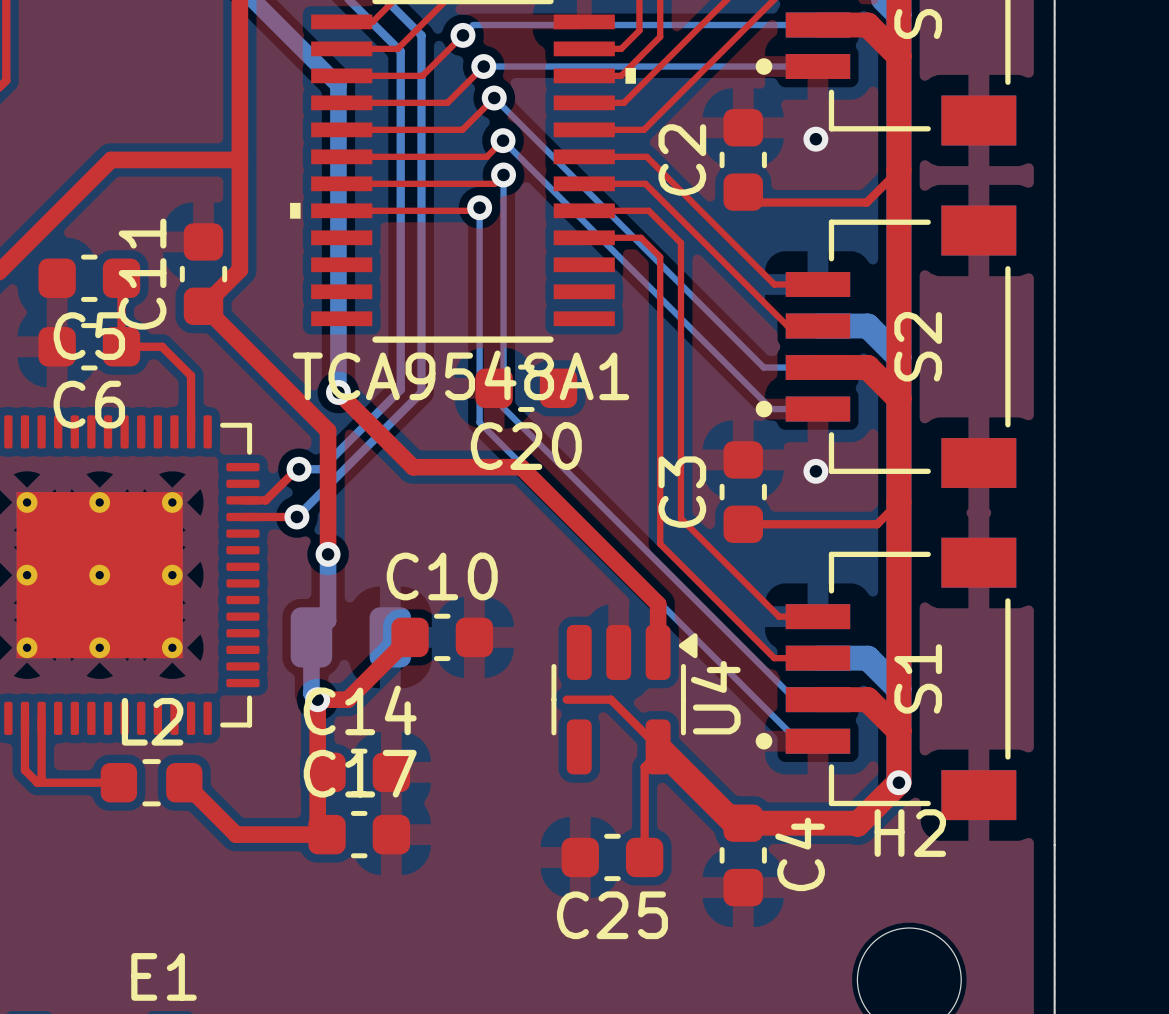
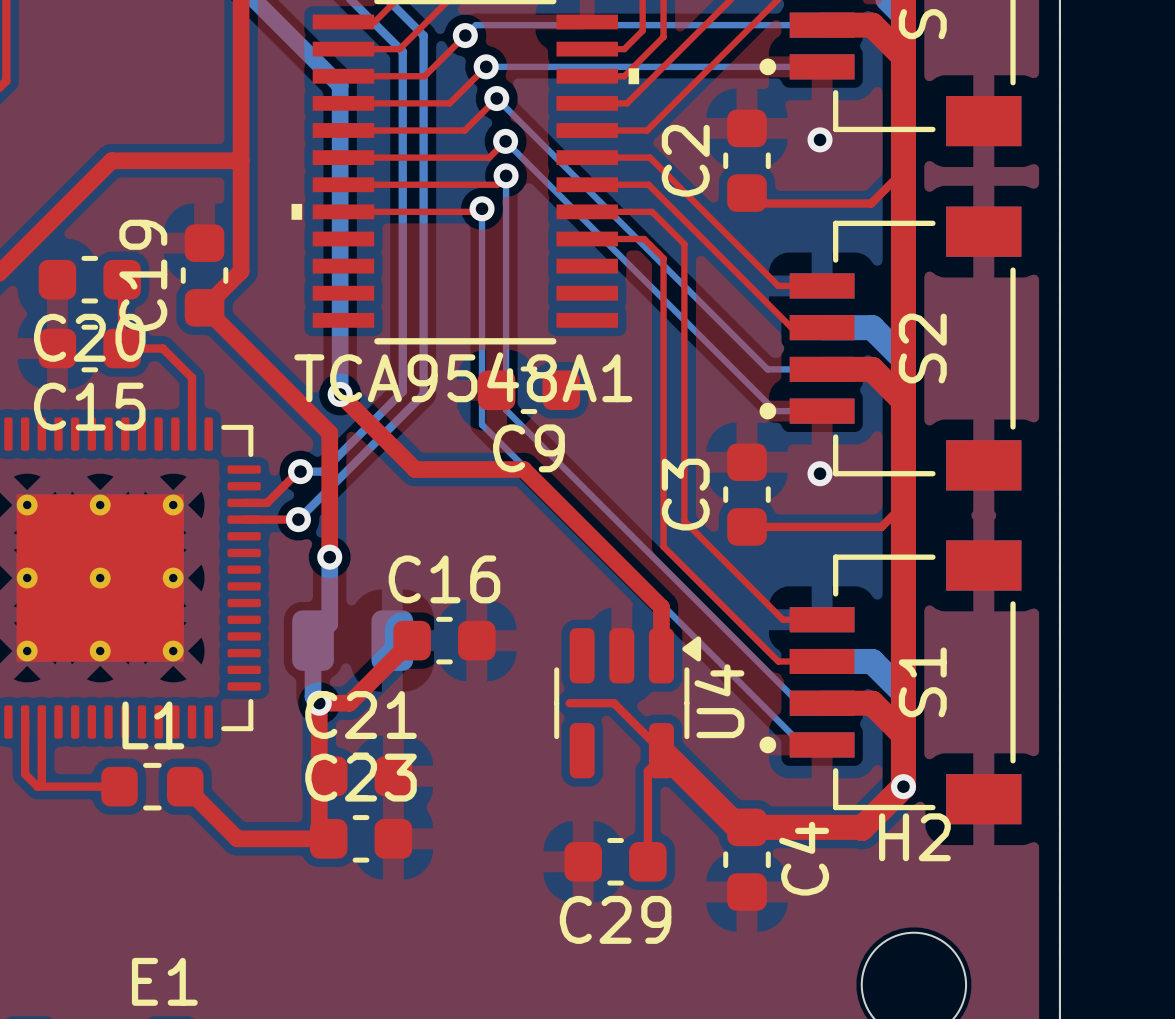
C11 name: C11 (142, 274) -> C19 (143, 275)
C5 name: C5 (89, 336) -> C20 (89, 337)
C6 name: C6 (89, 404) -> C15 (89, 406)
C20 name: C20 (526, 446) -> C9 (528, 448)
C10 name: C10 (442, 576) -> C16 (444, 579)
C14 name: C14 (360, 710) -> C21 (361, 715)
L2 name: L2 (152, 721) -> L1 (153, 725)
C17 name: C17 (360, 773) -> C23 (361, 777)
C25 name: C25 (612, 915) -> C29 (615, 919)

